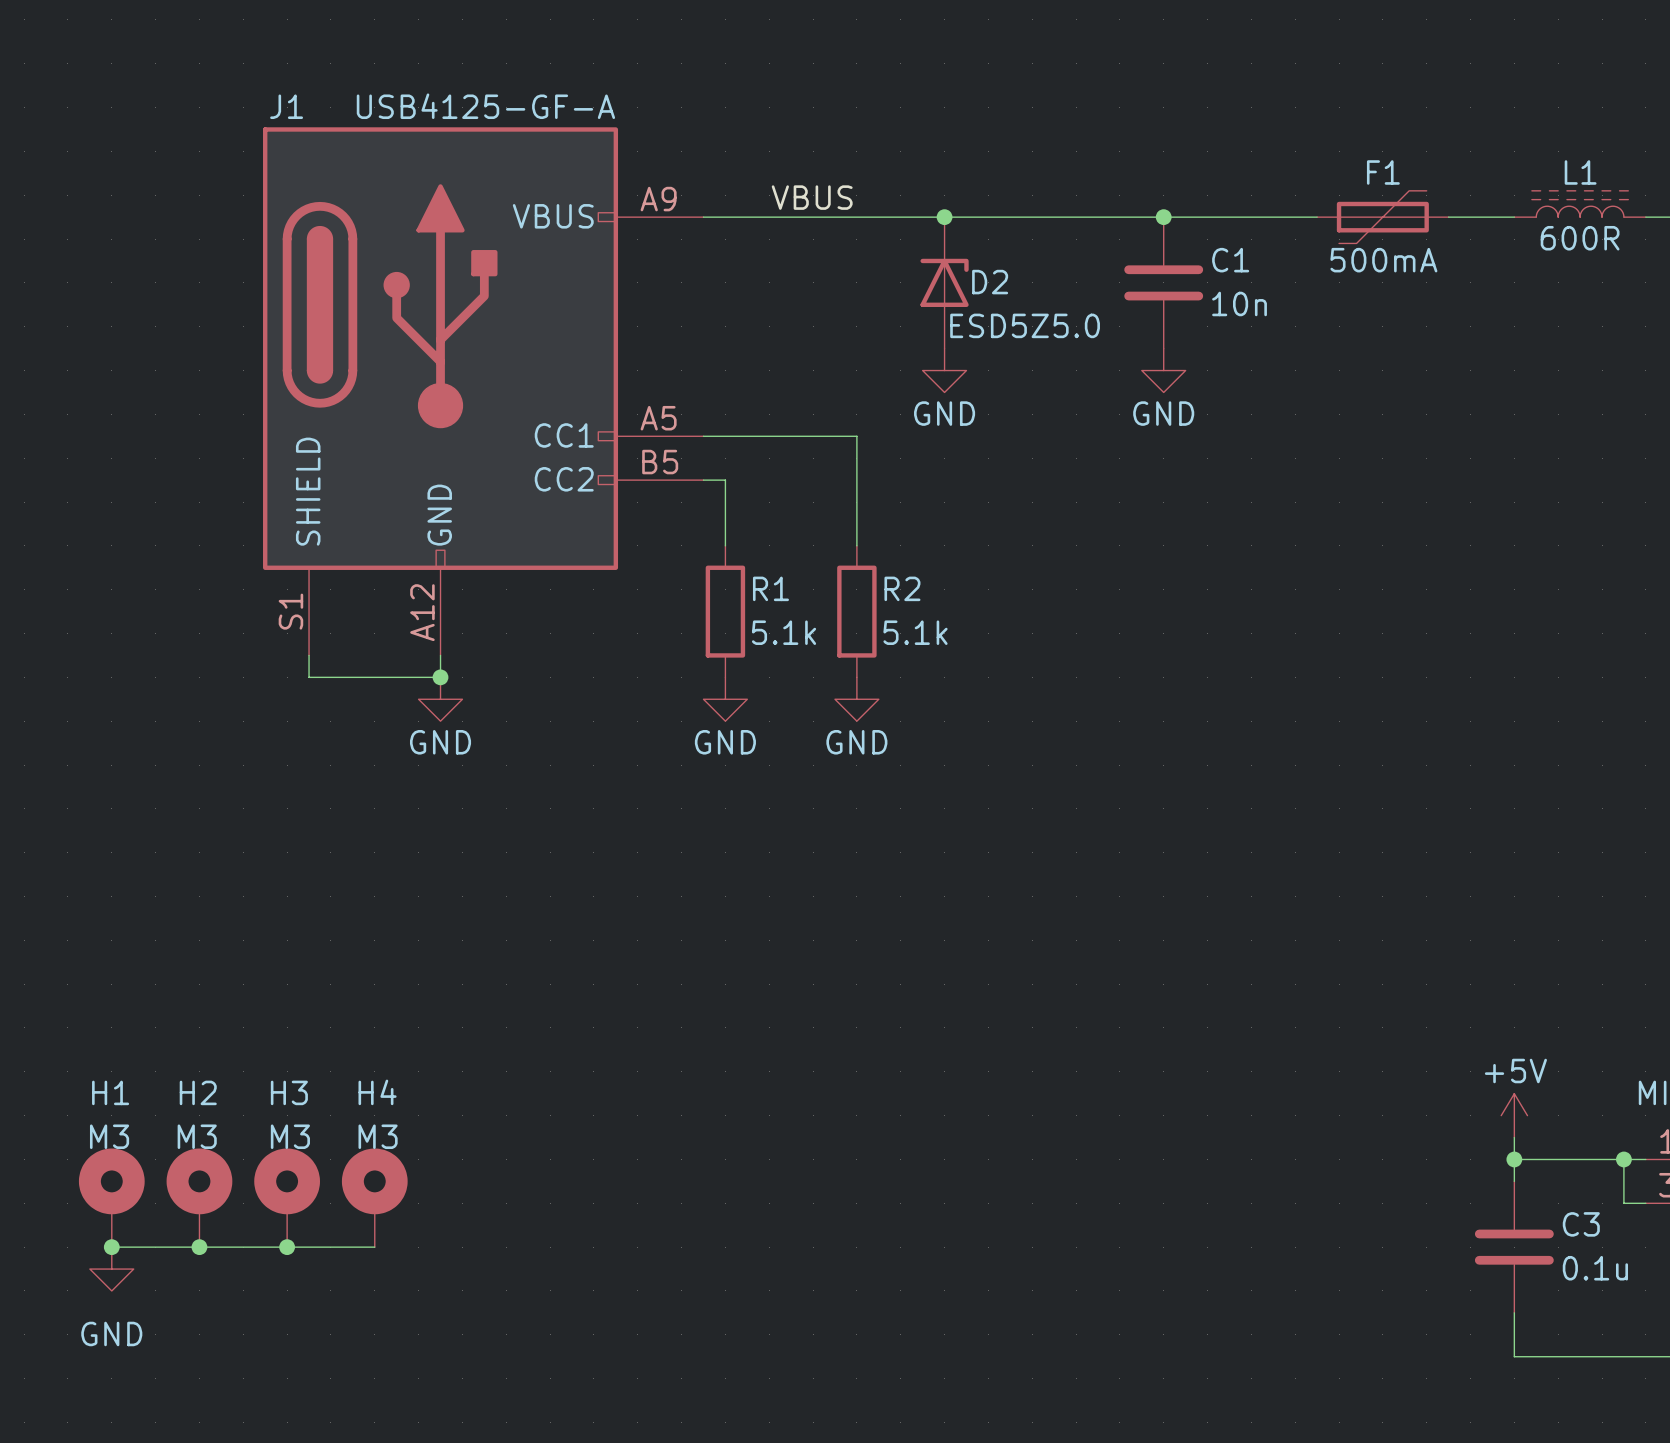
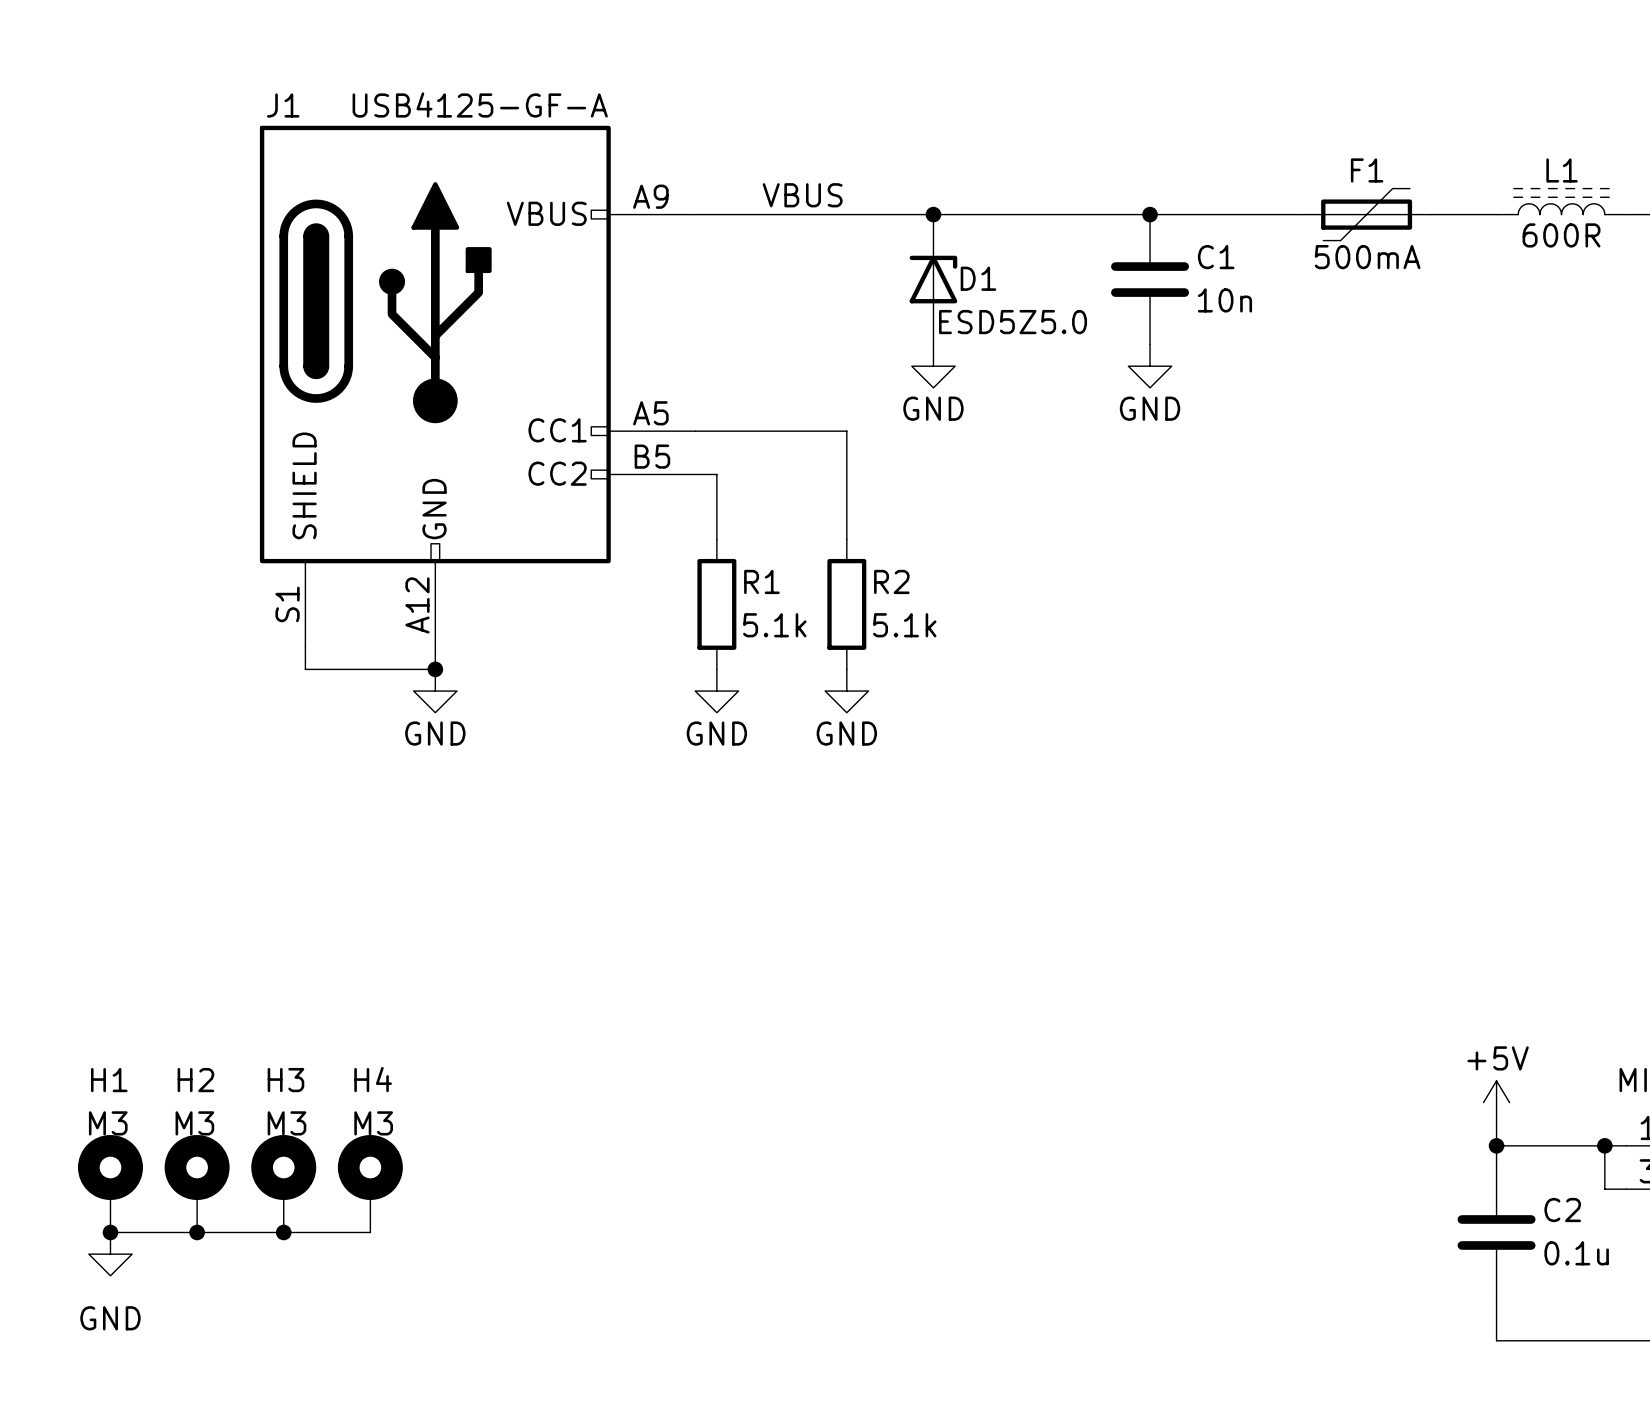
D2 name: D2 (990, 282) -> D1 (978, 278)
C3 name: C3 (1581, 1224) -> C2 (1562, 1210)

